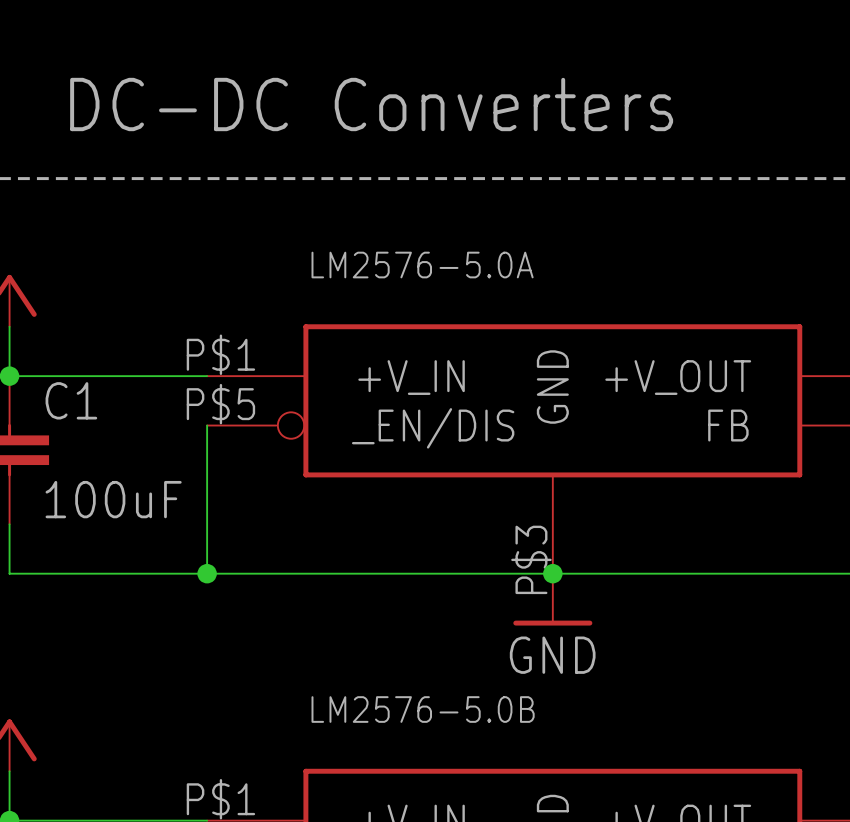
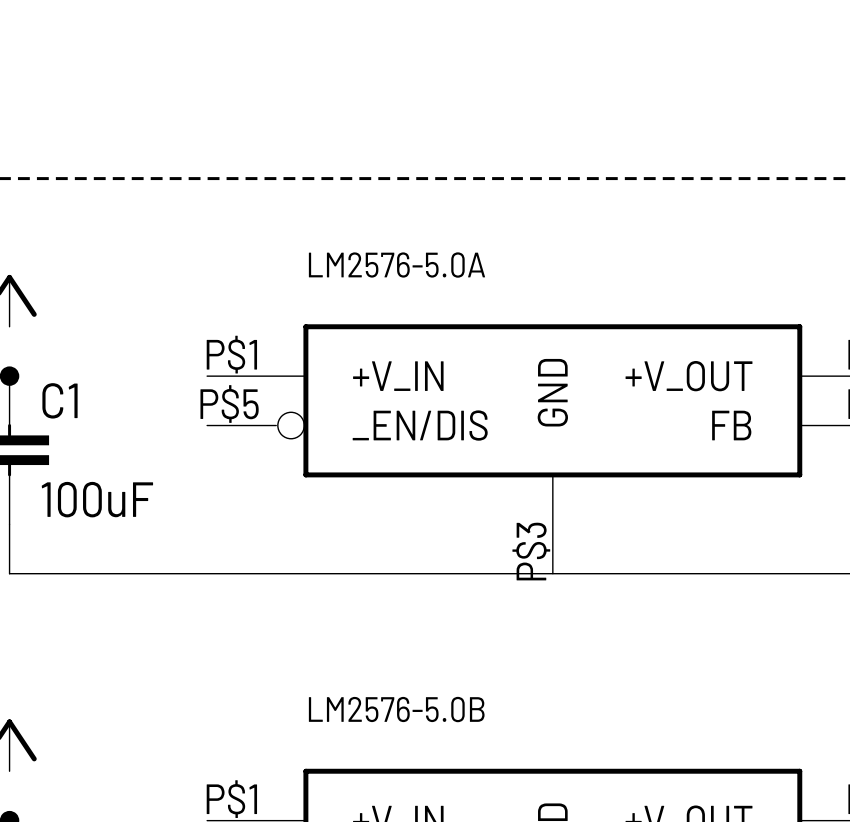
text: DC-DC Converters (371, 104) -> none
wire: (9, 326) (9, 376) (207, 376) -> none
wire: (207, 425) (207, 573) -> none
junction: (207, 573) -> none
junction: (552, 573) -> none
power symbol: GND (552, 599) -> none
wire: (9, 771) (9, 820) (207, 820) -> none

